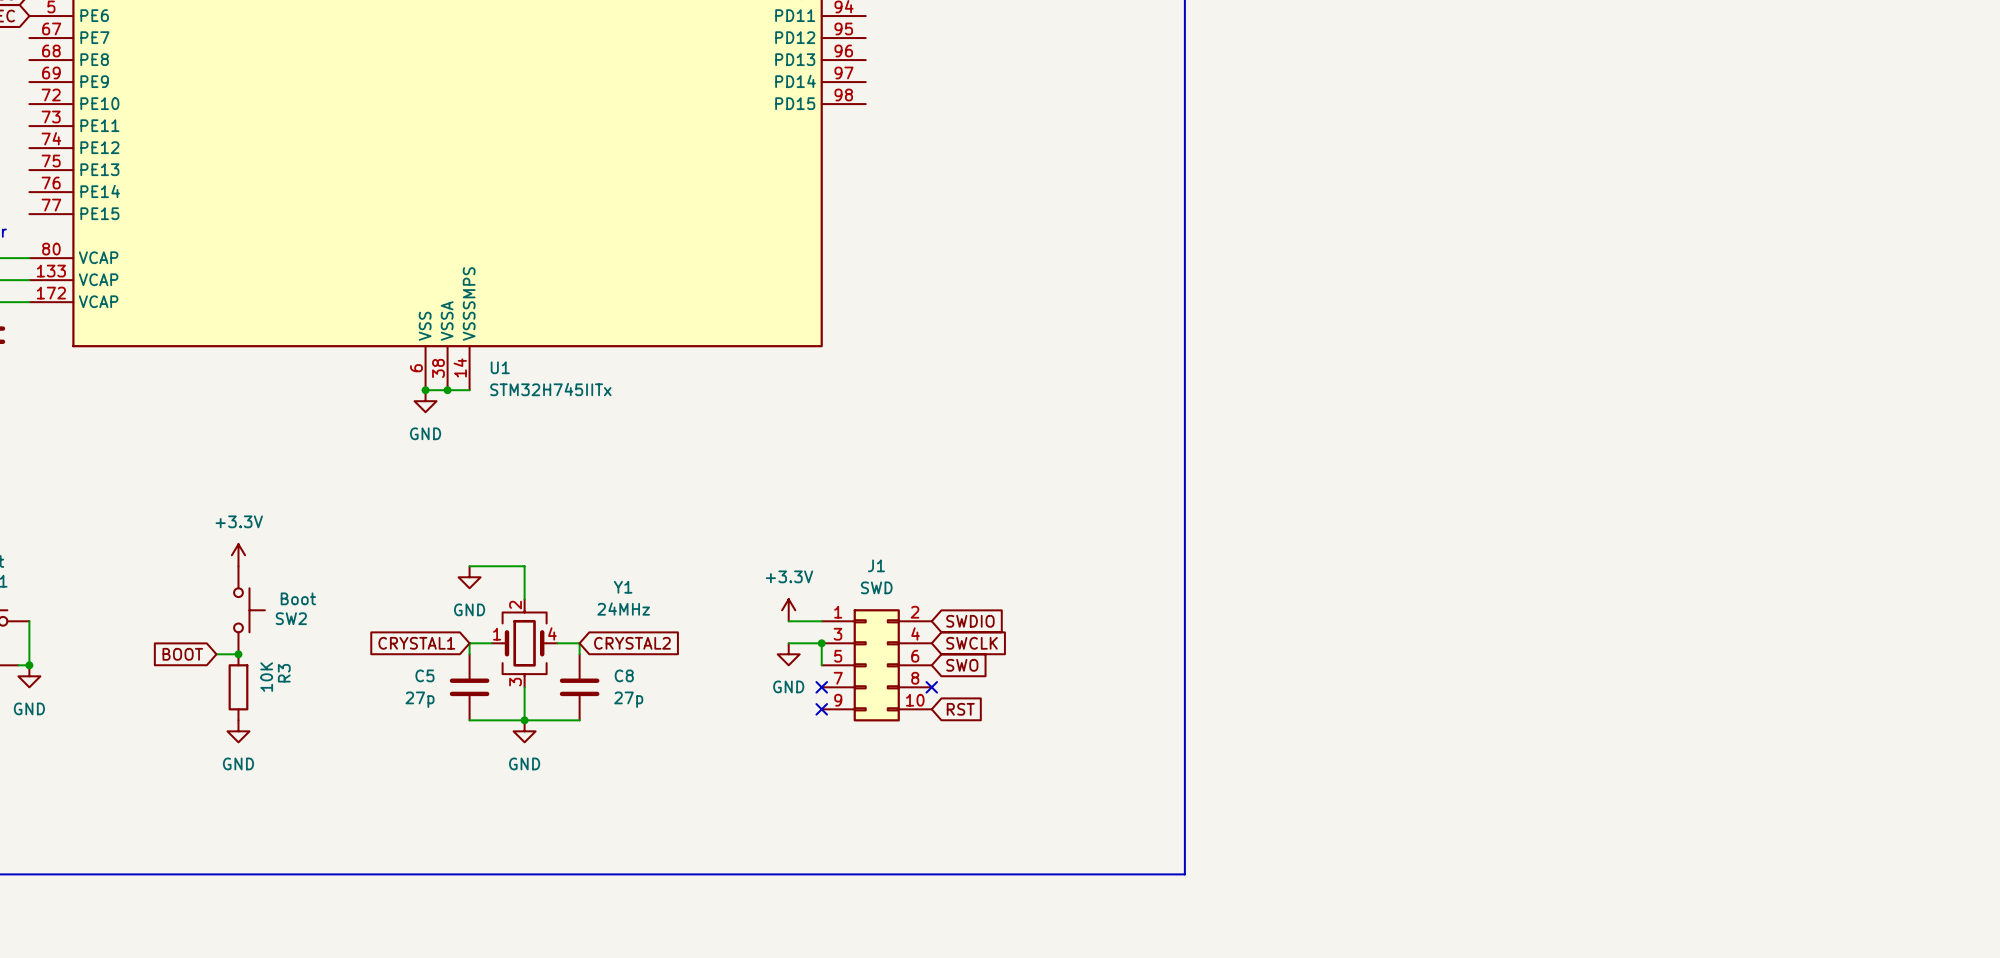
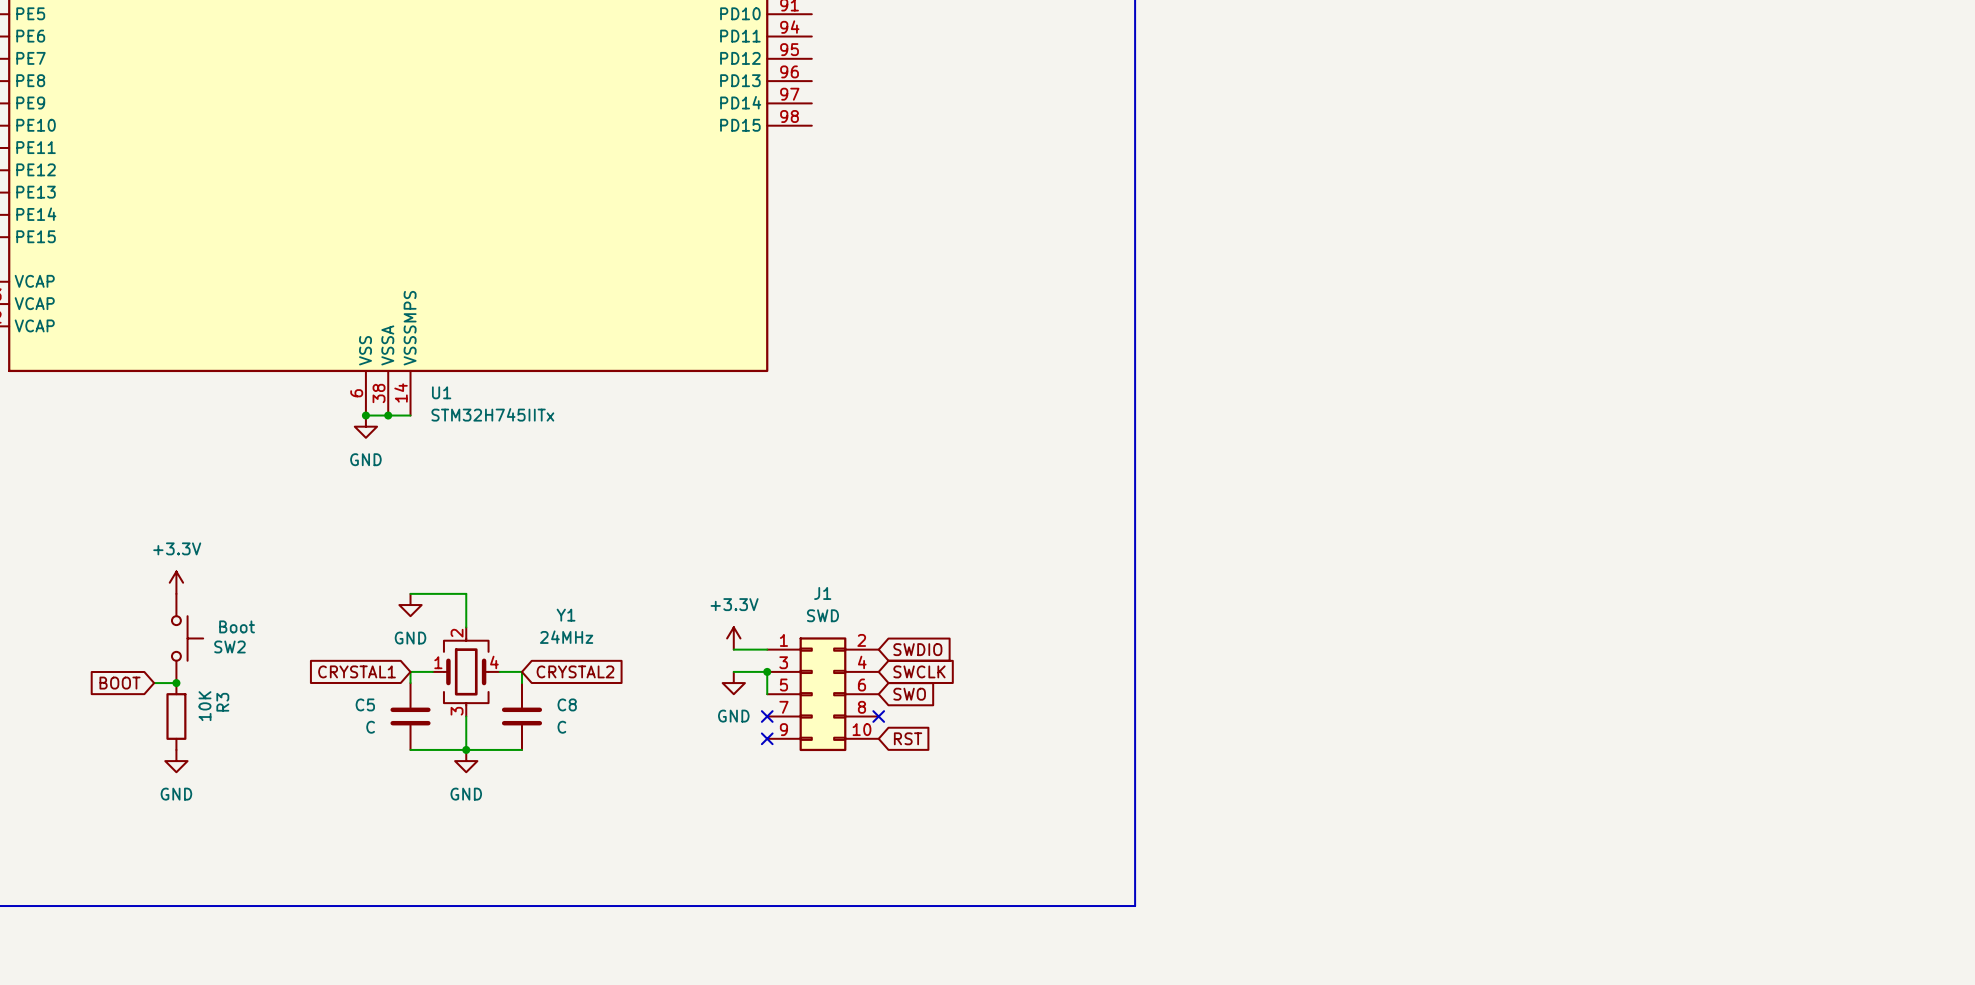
C5 value: 27p (419, 699) -> C (370, 727)
C8 value: 27p (628, 699) -> C (561, 727)

